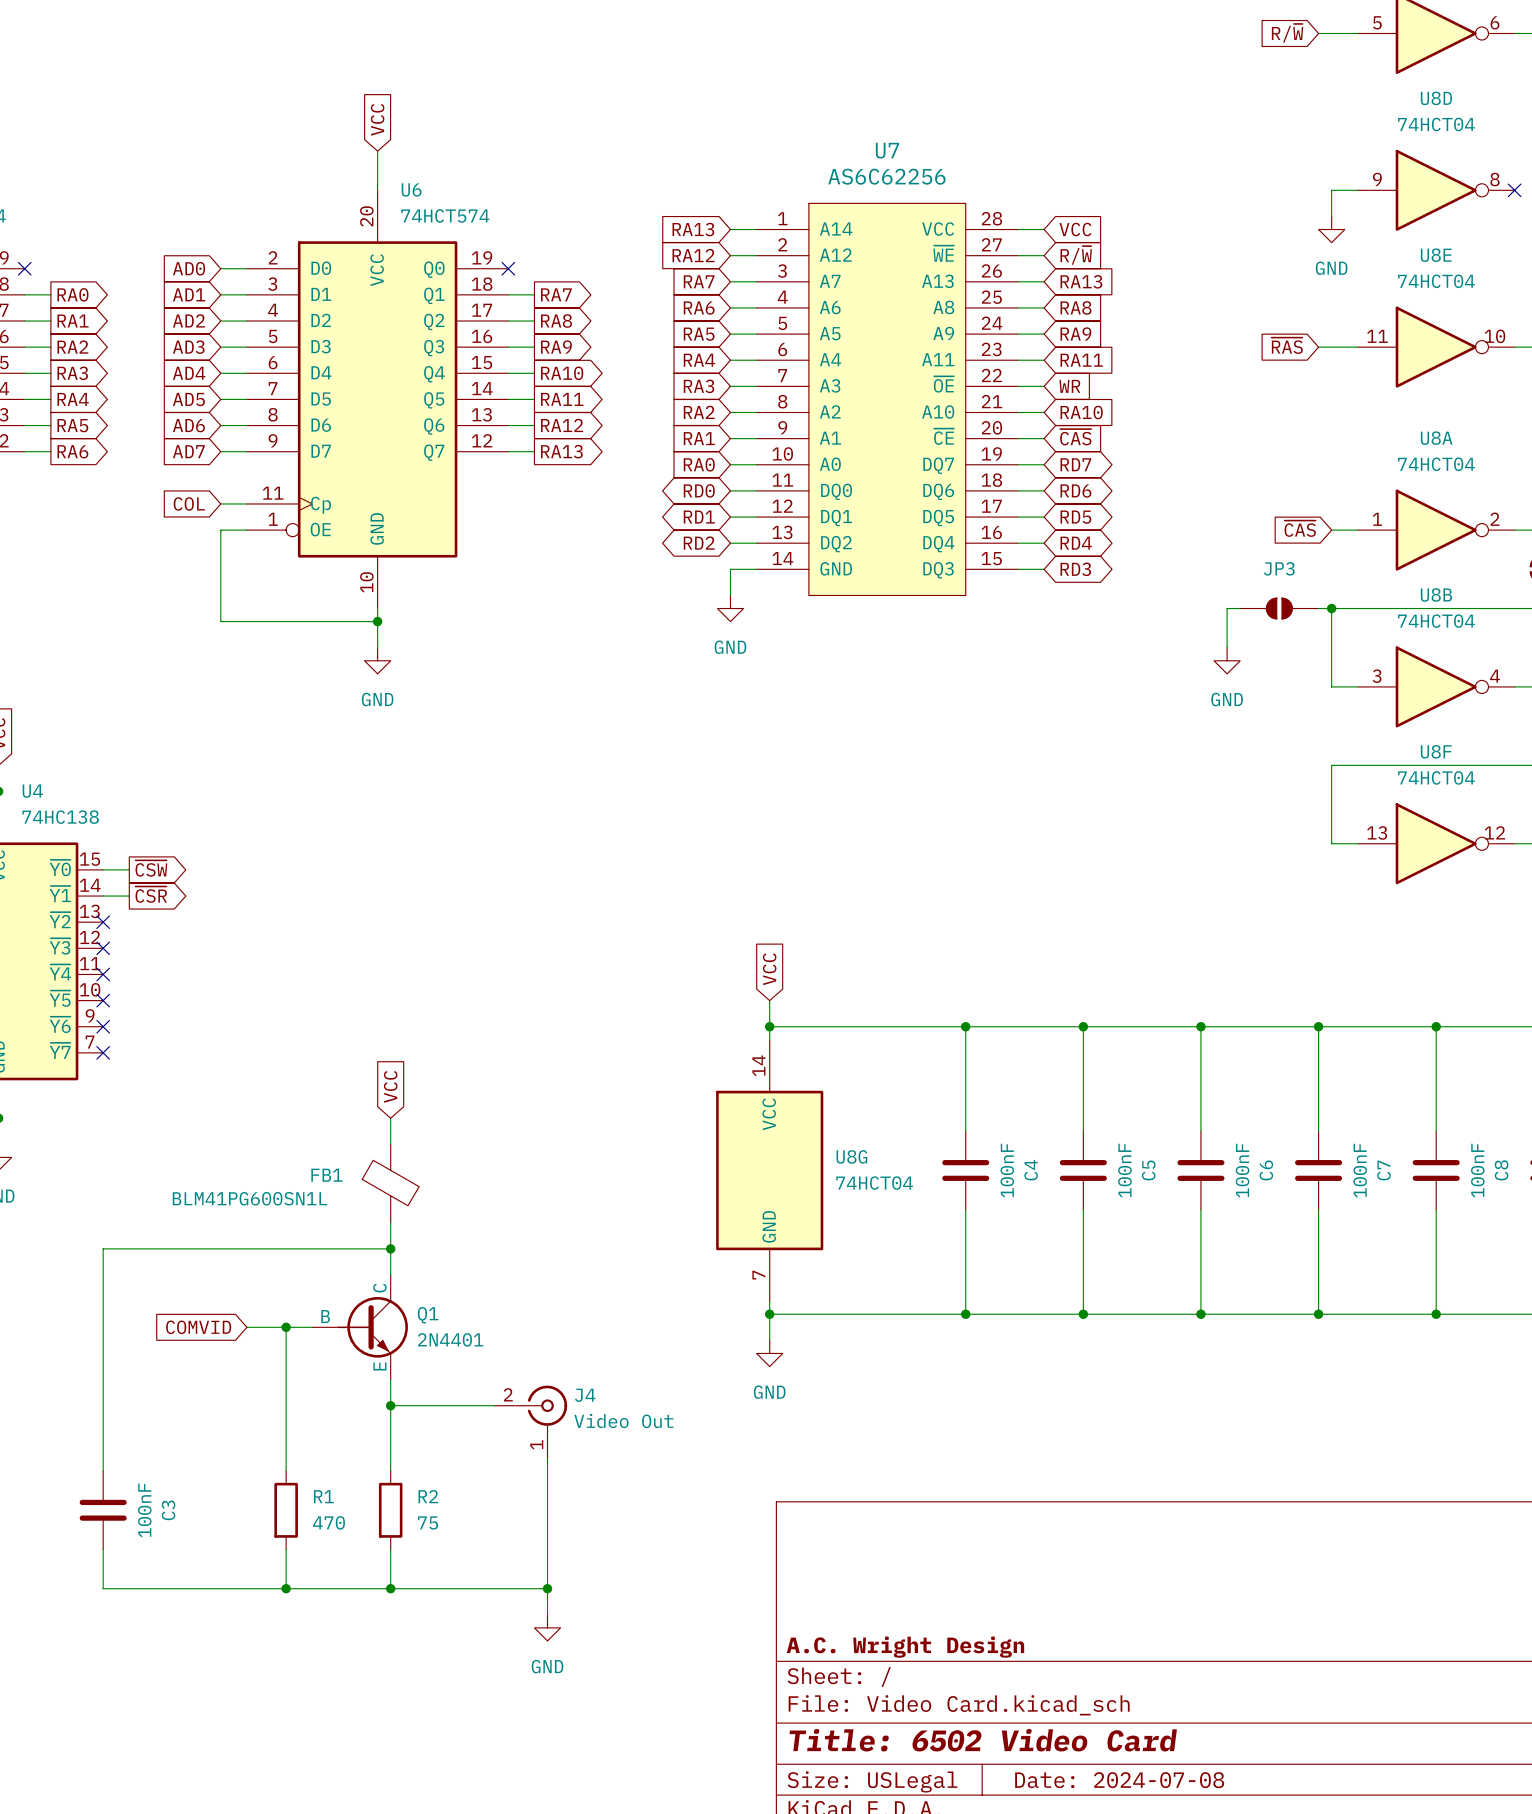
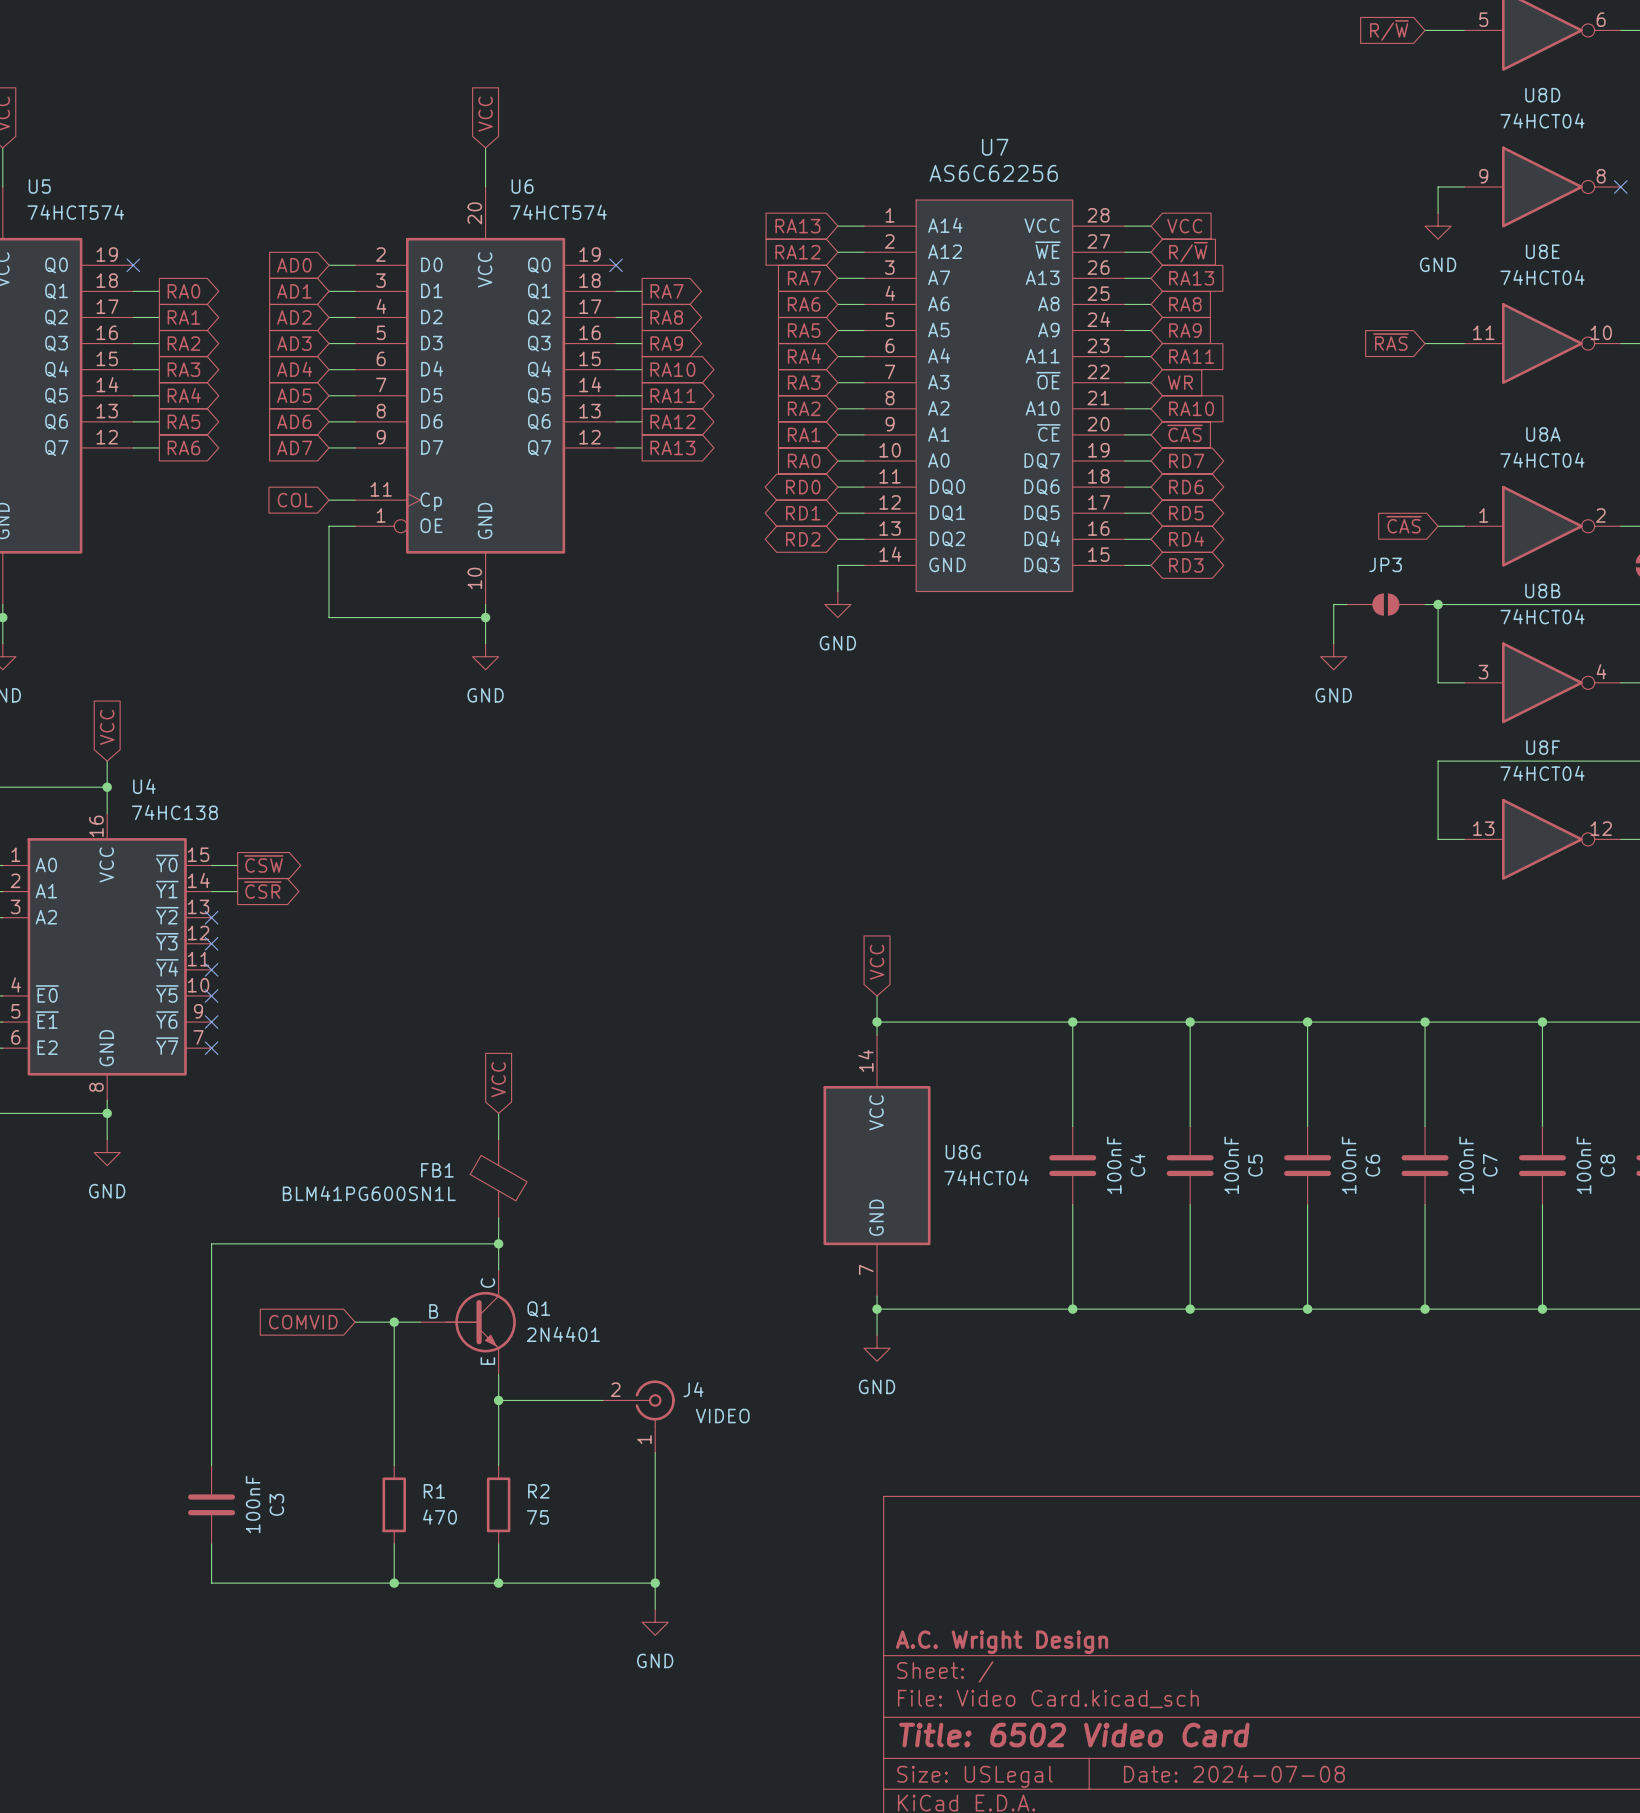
J4 value: Video Out (623, 1420) -> VIDEO (722, 1416)

